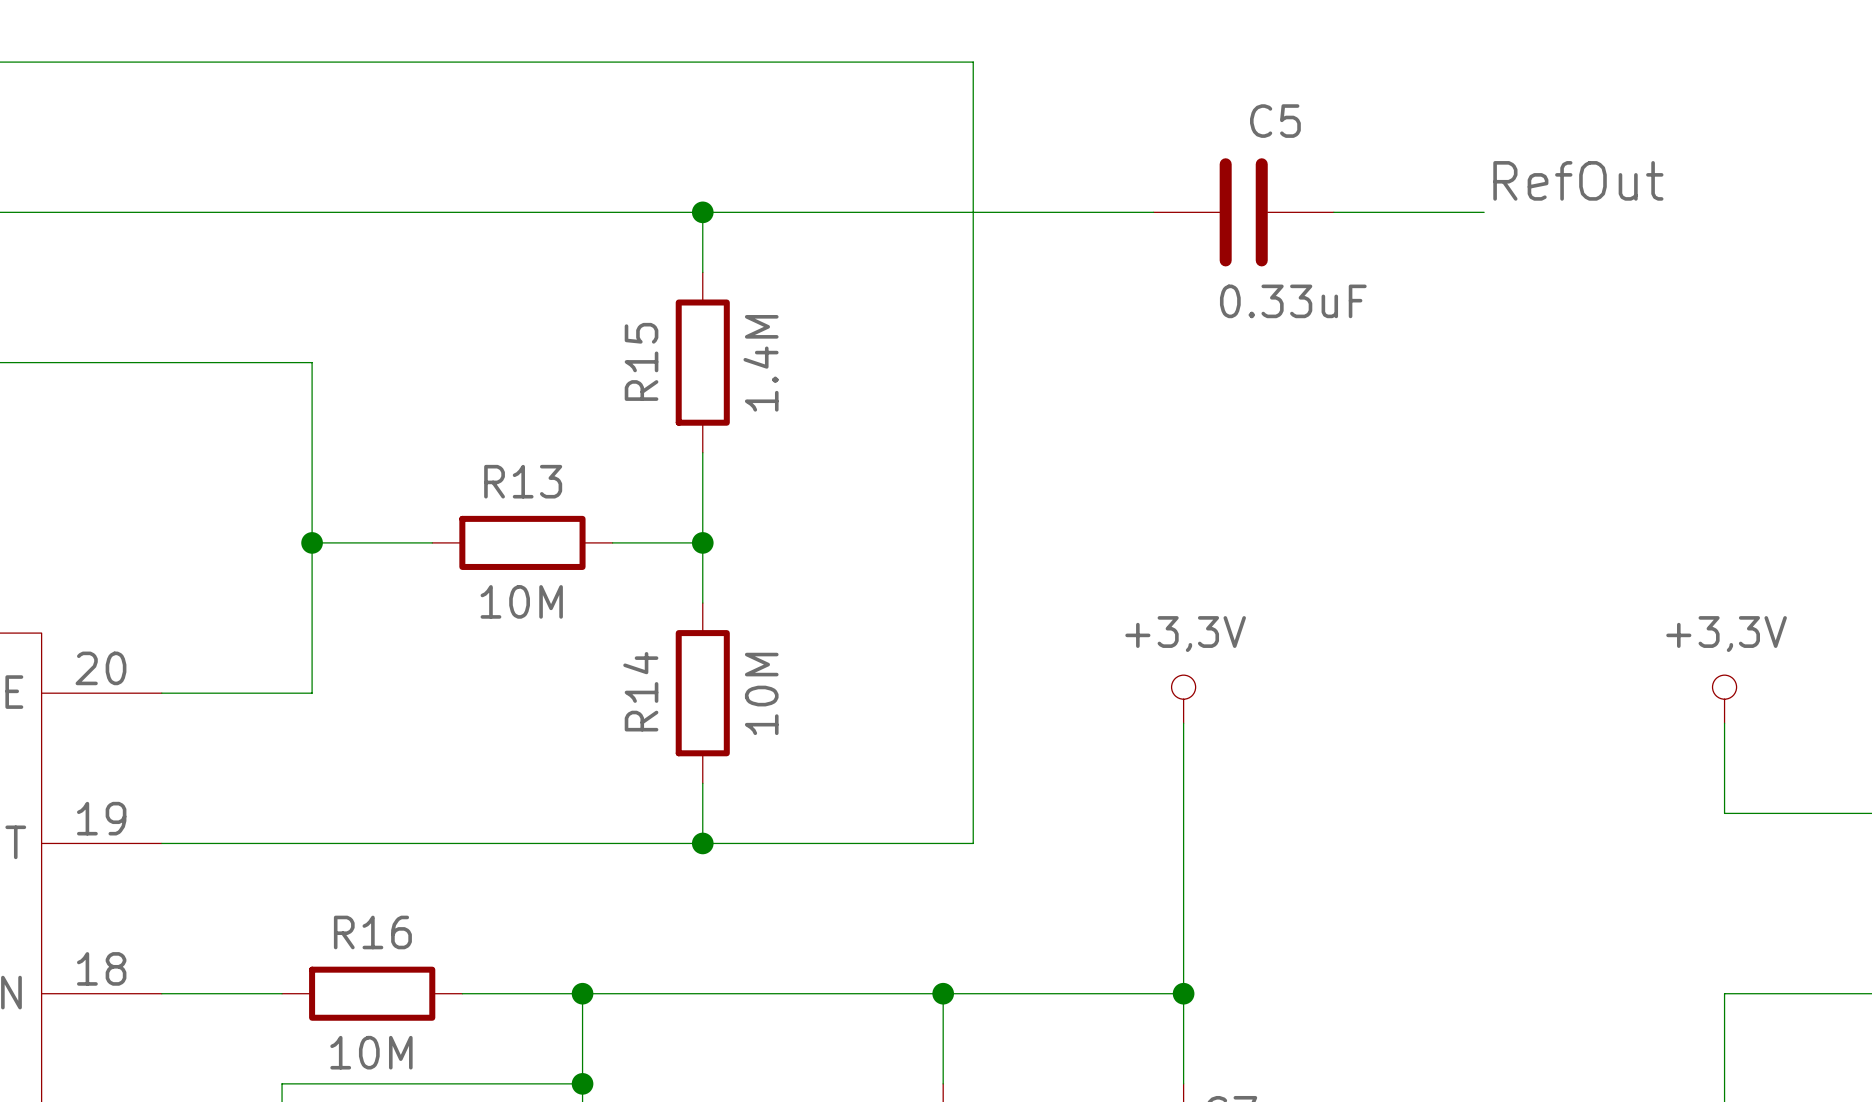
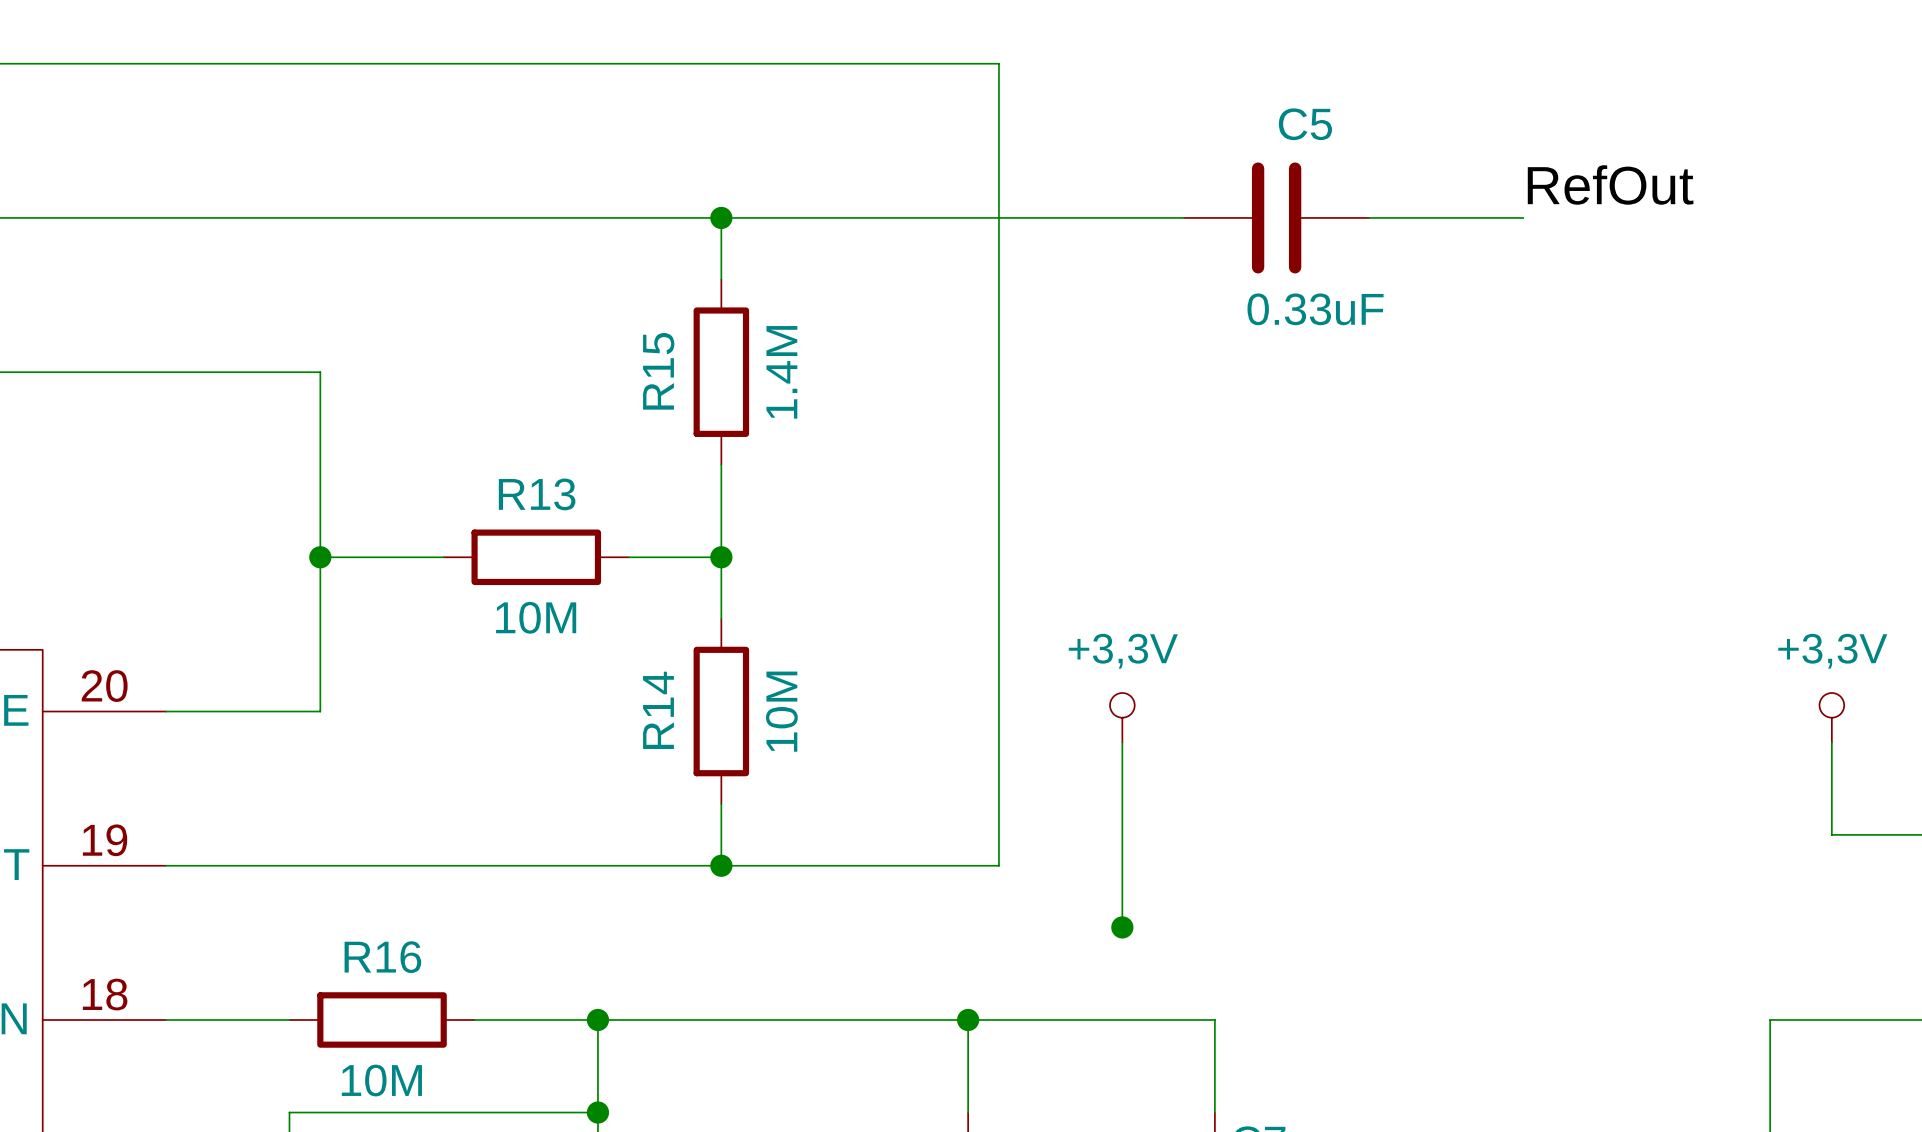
power symbol position: +3,3V (1183, 699) -> +3,3V (1122, 717)
power symbol position: +3,3V (1724, 699) -> +3,3V (1831, 717)
wire: none -> (1122, 742) (1122, 927)
wire: (1183, 723) (1183, 993) -> none
wire: (1724, 723) (1724, 813) (1784, 813) -> (1831, 742) (1831, 834)
junction position: (1183, 993) -> (1122, 927)

